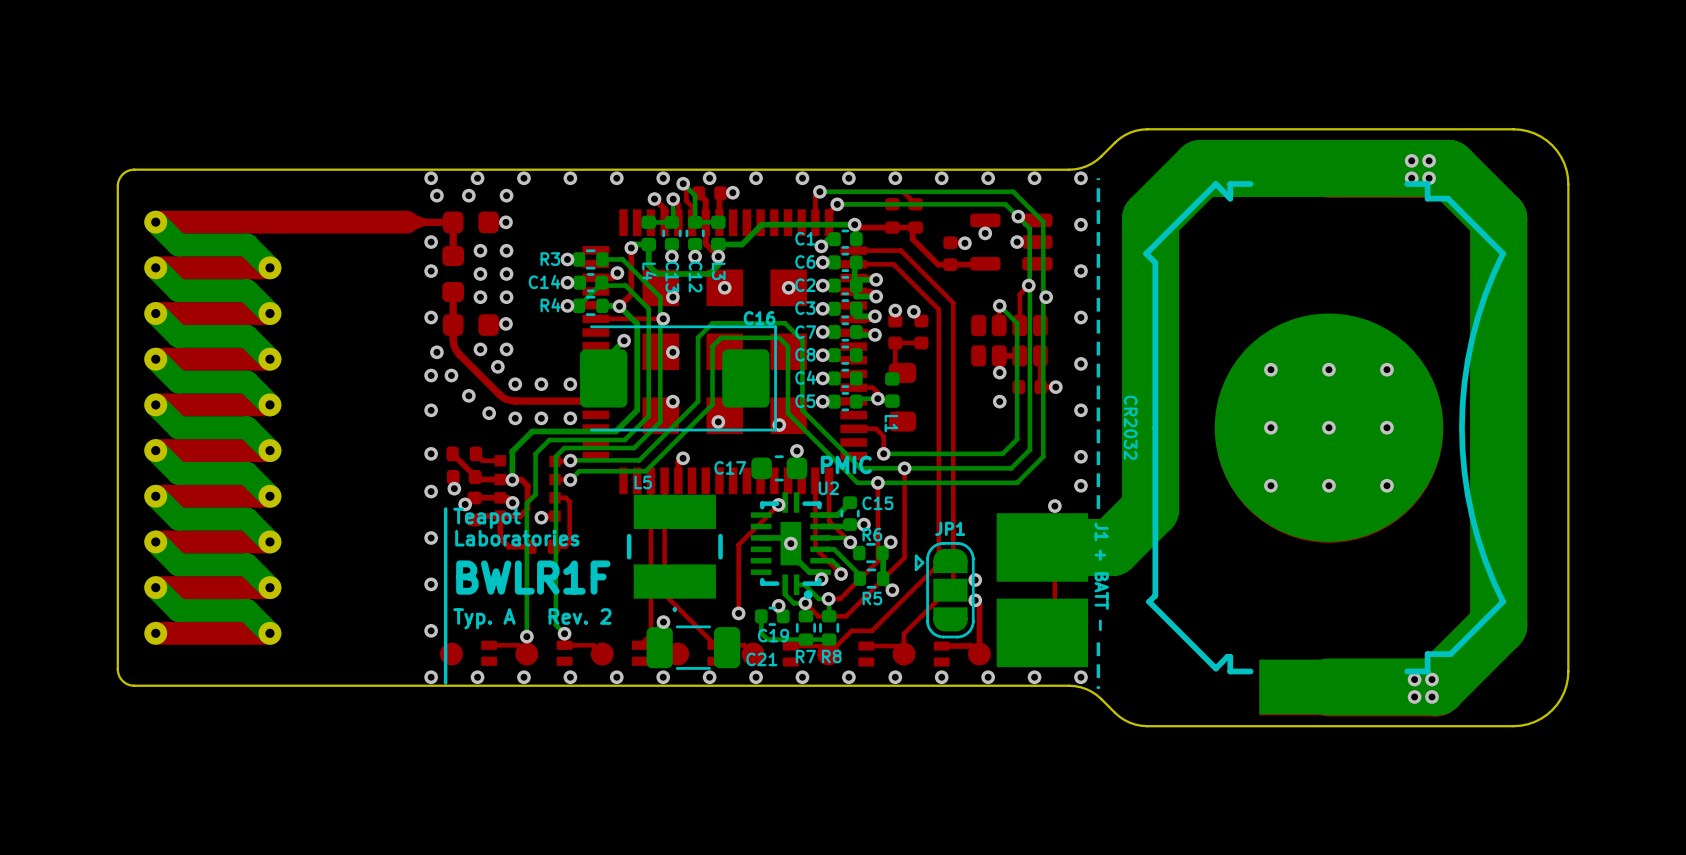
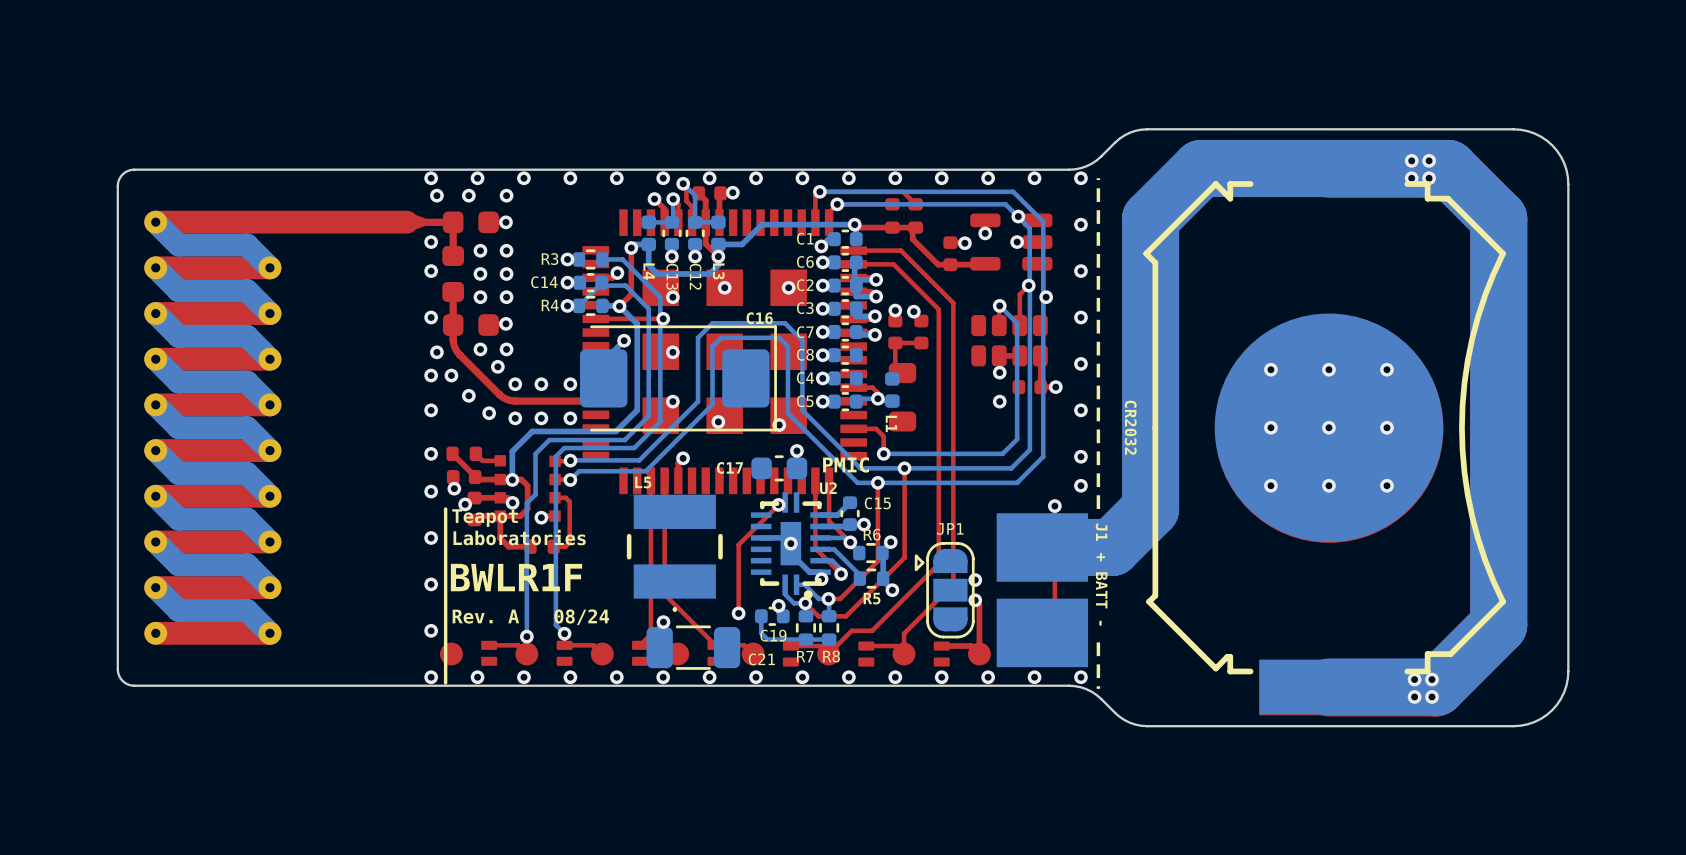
text: Typ. A Rev. 2 (532, 618) -> Rev. A 08/24 (530, 617)

